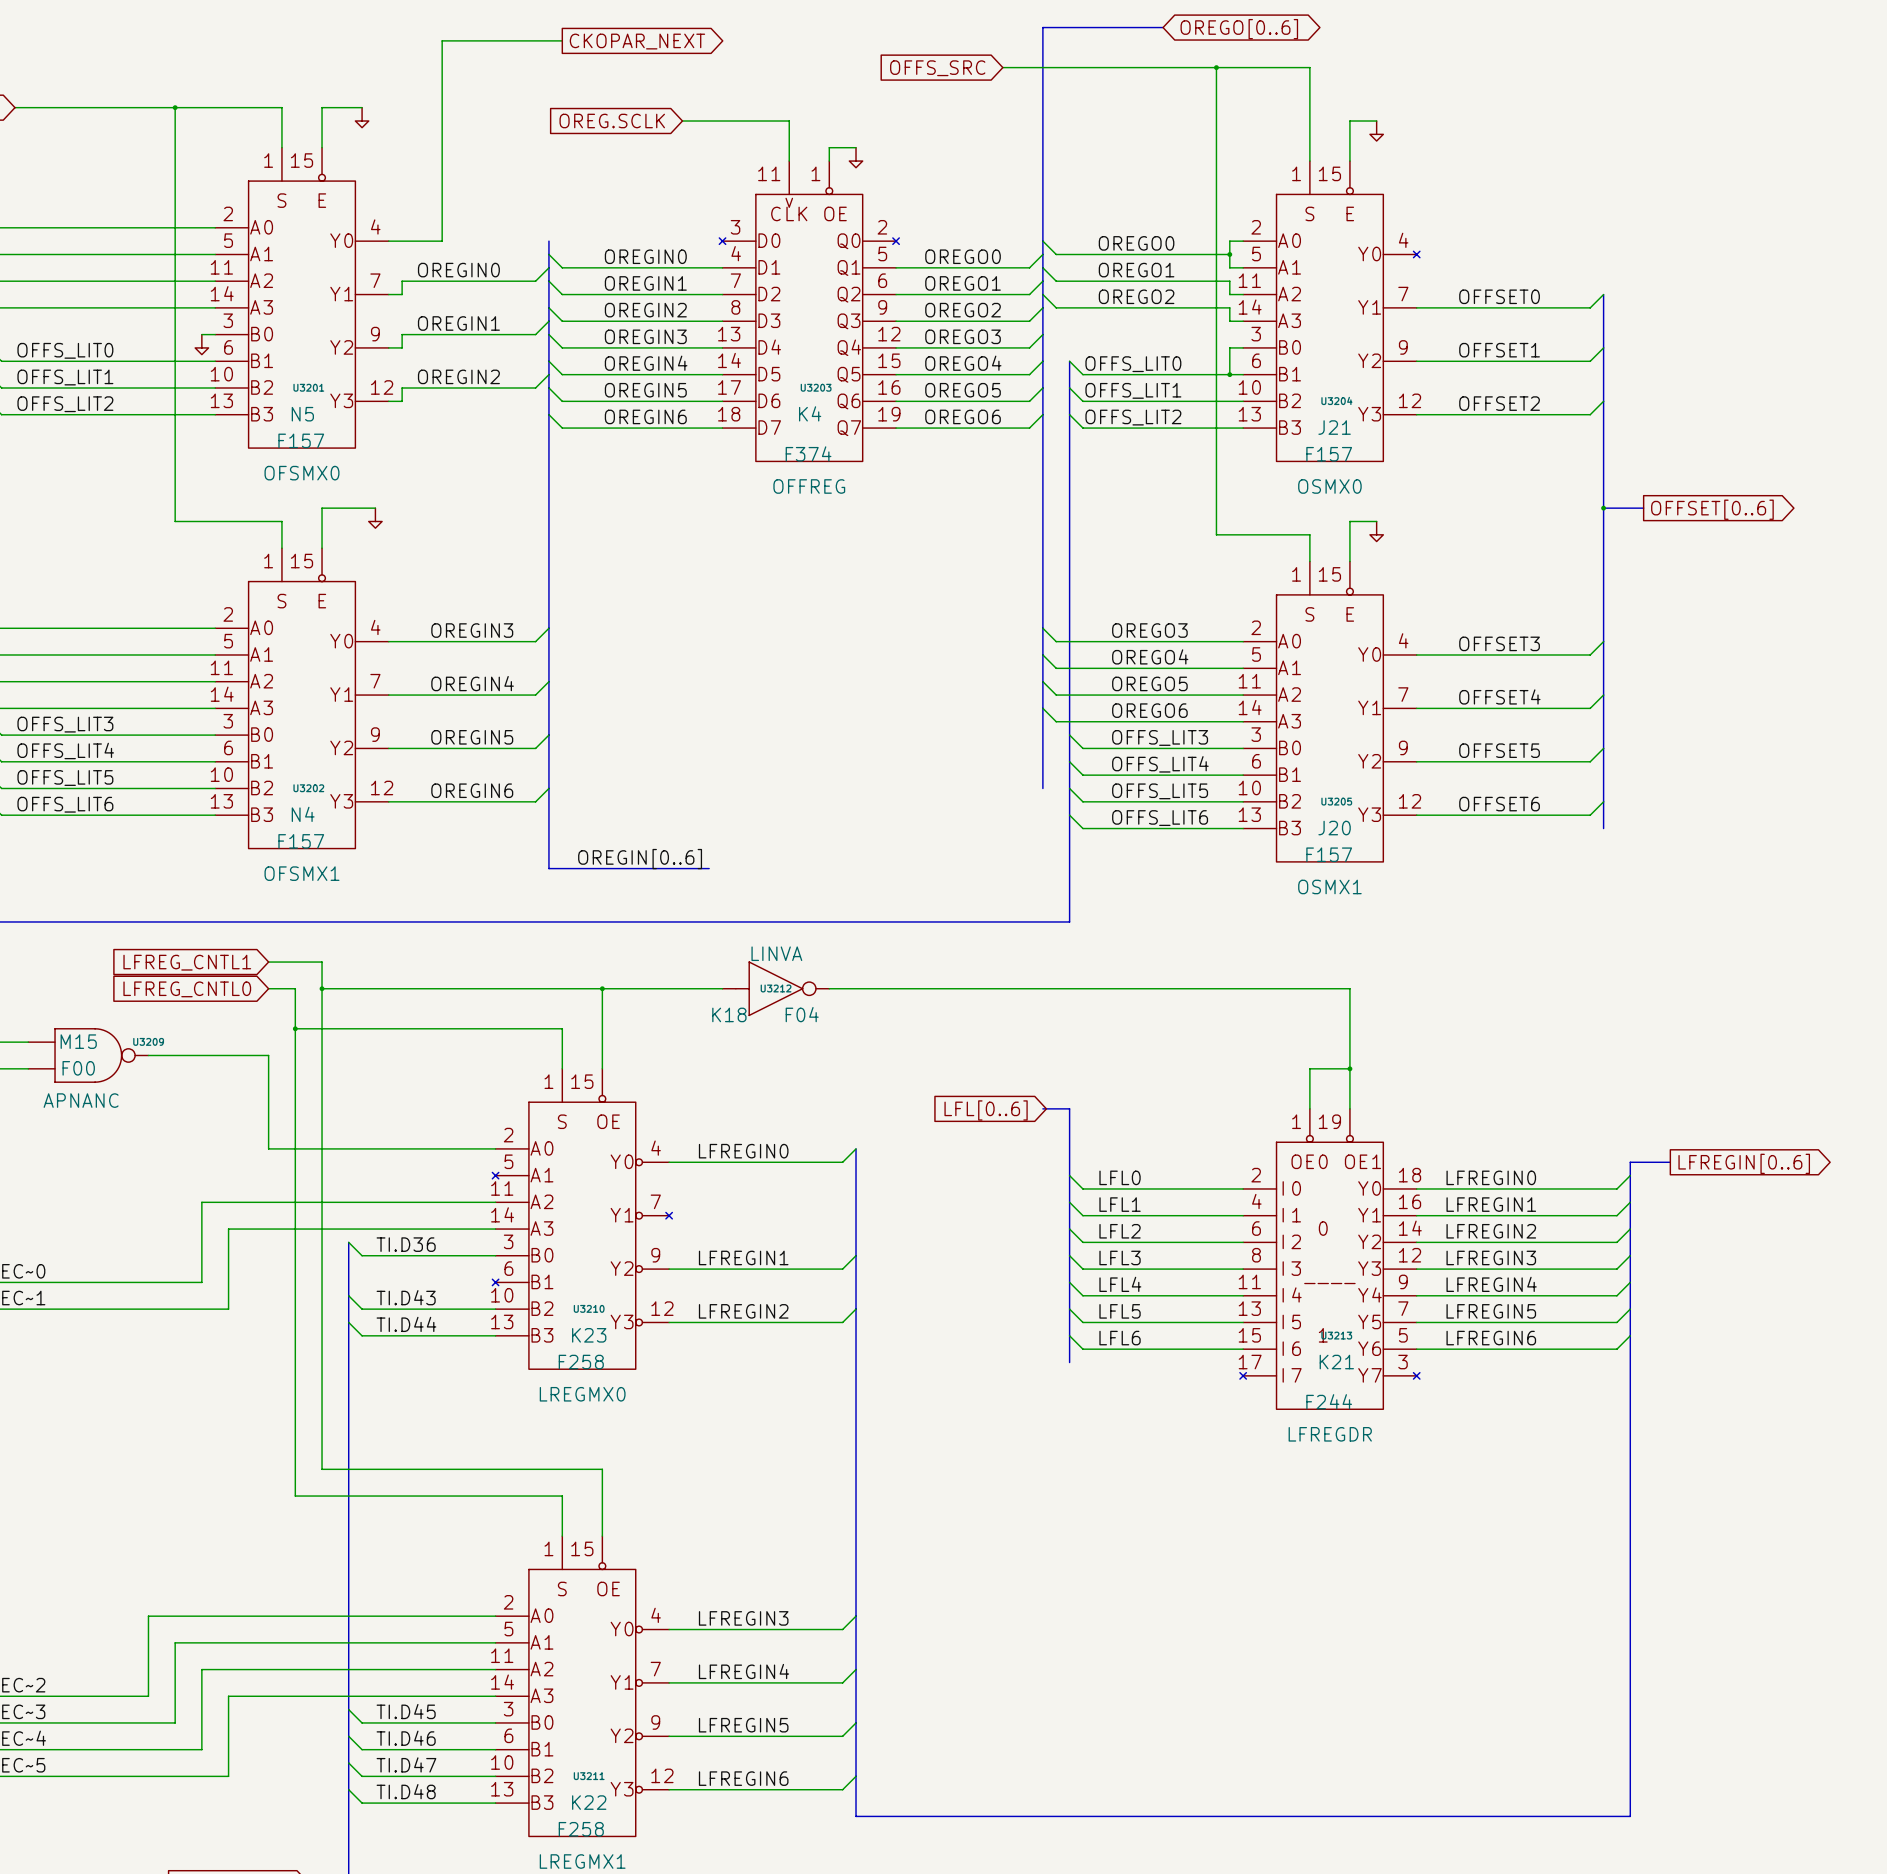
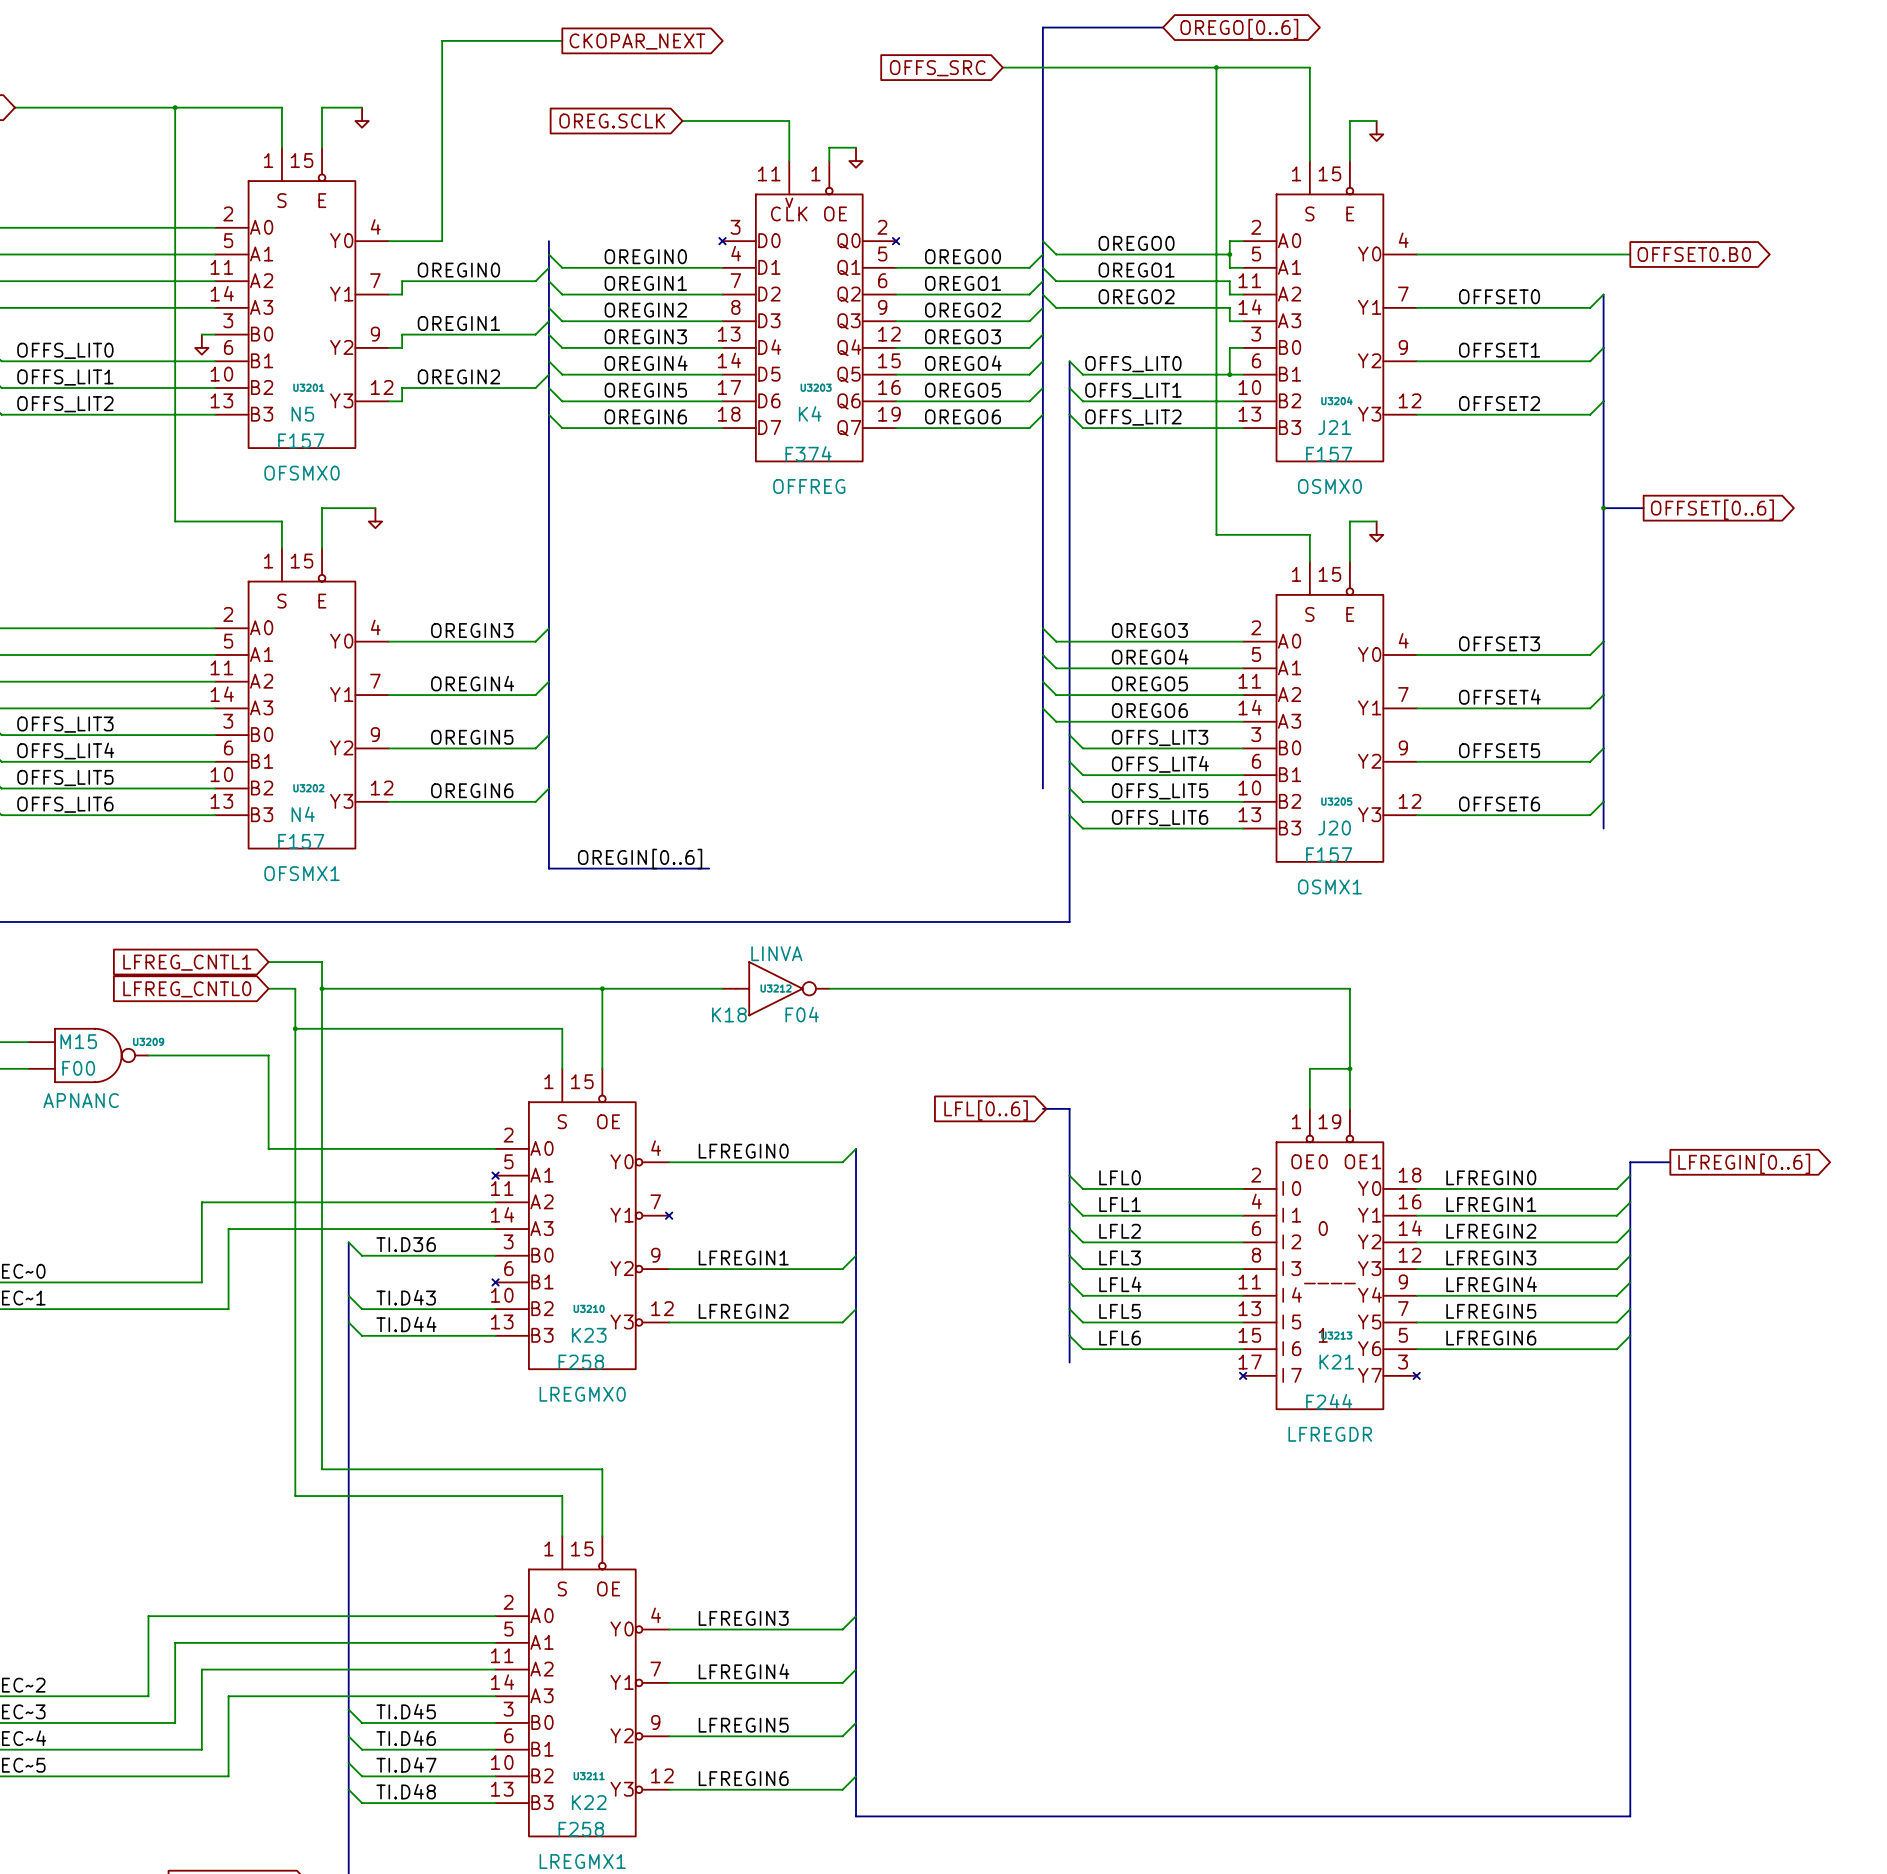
wire: none -> (1416, 254) (1630, 254)
no-connect mark: (1416, 254) -> none
global label: none -> OFFSET0.B0 (1694, 254)

